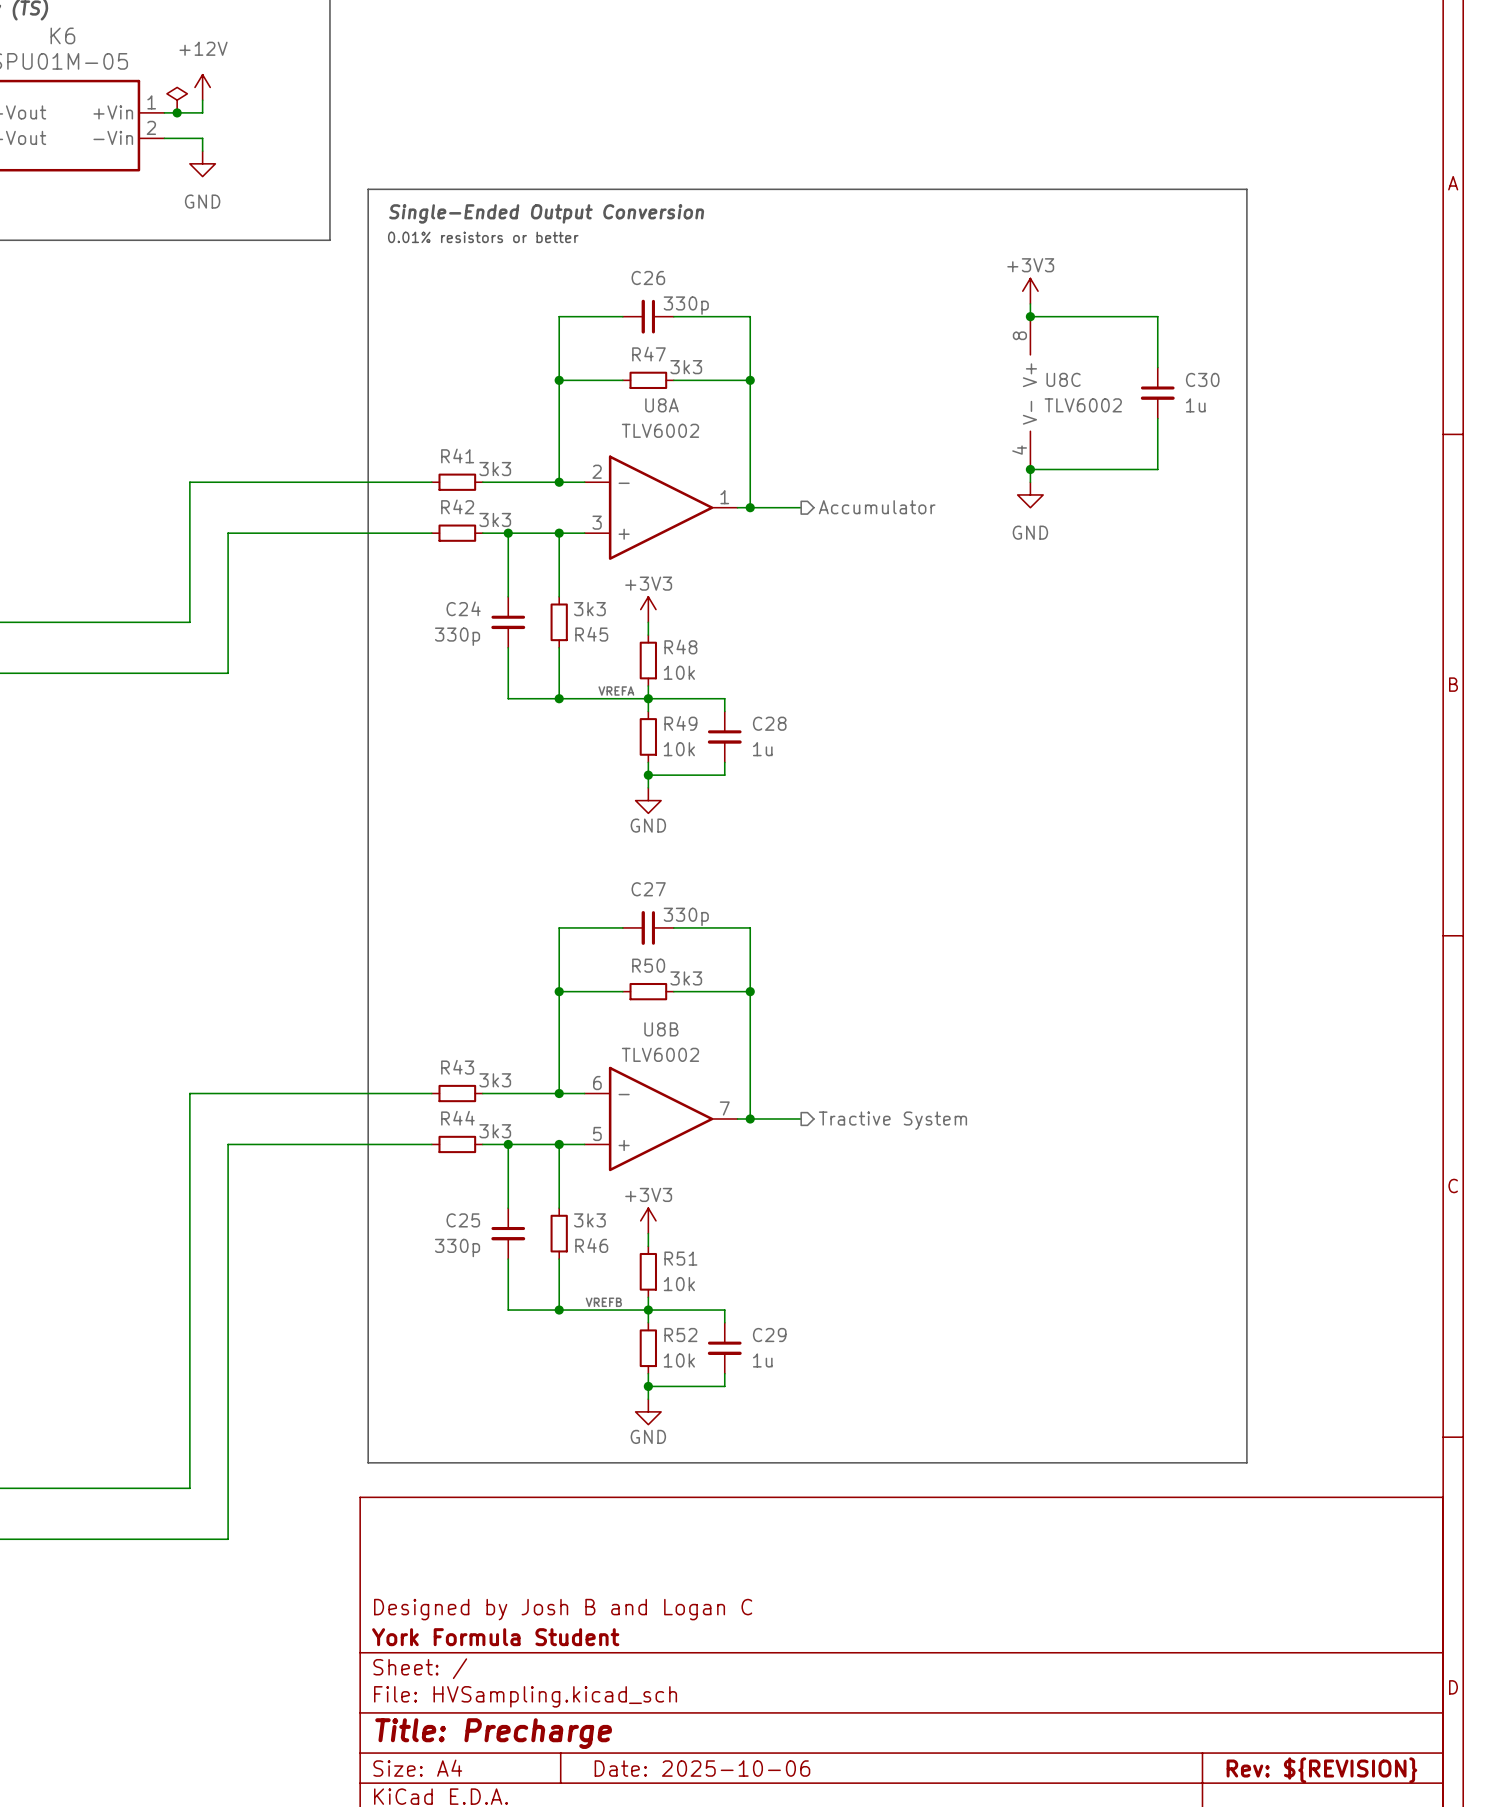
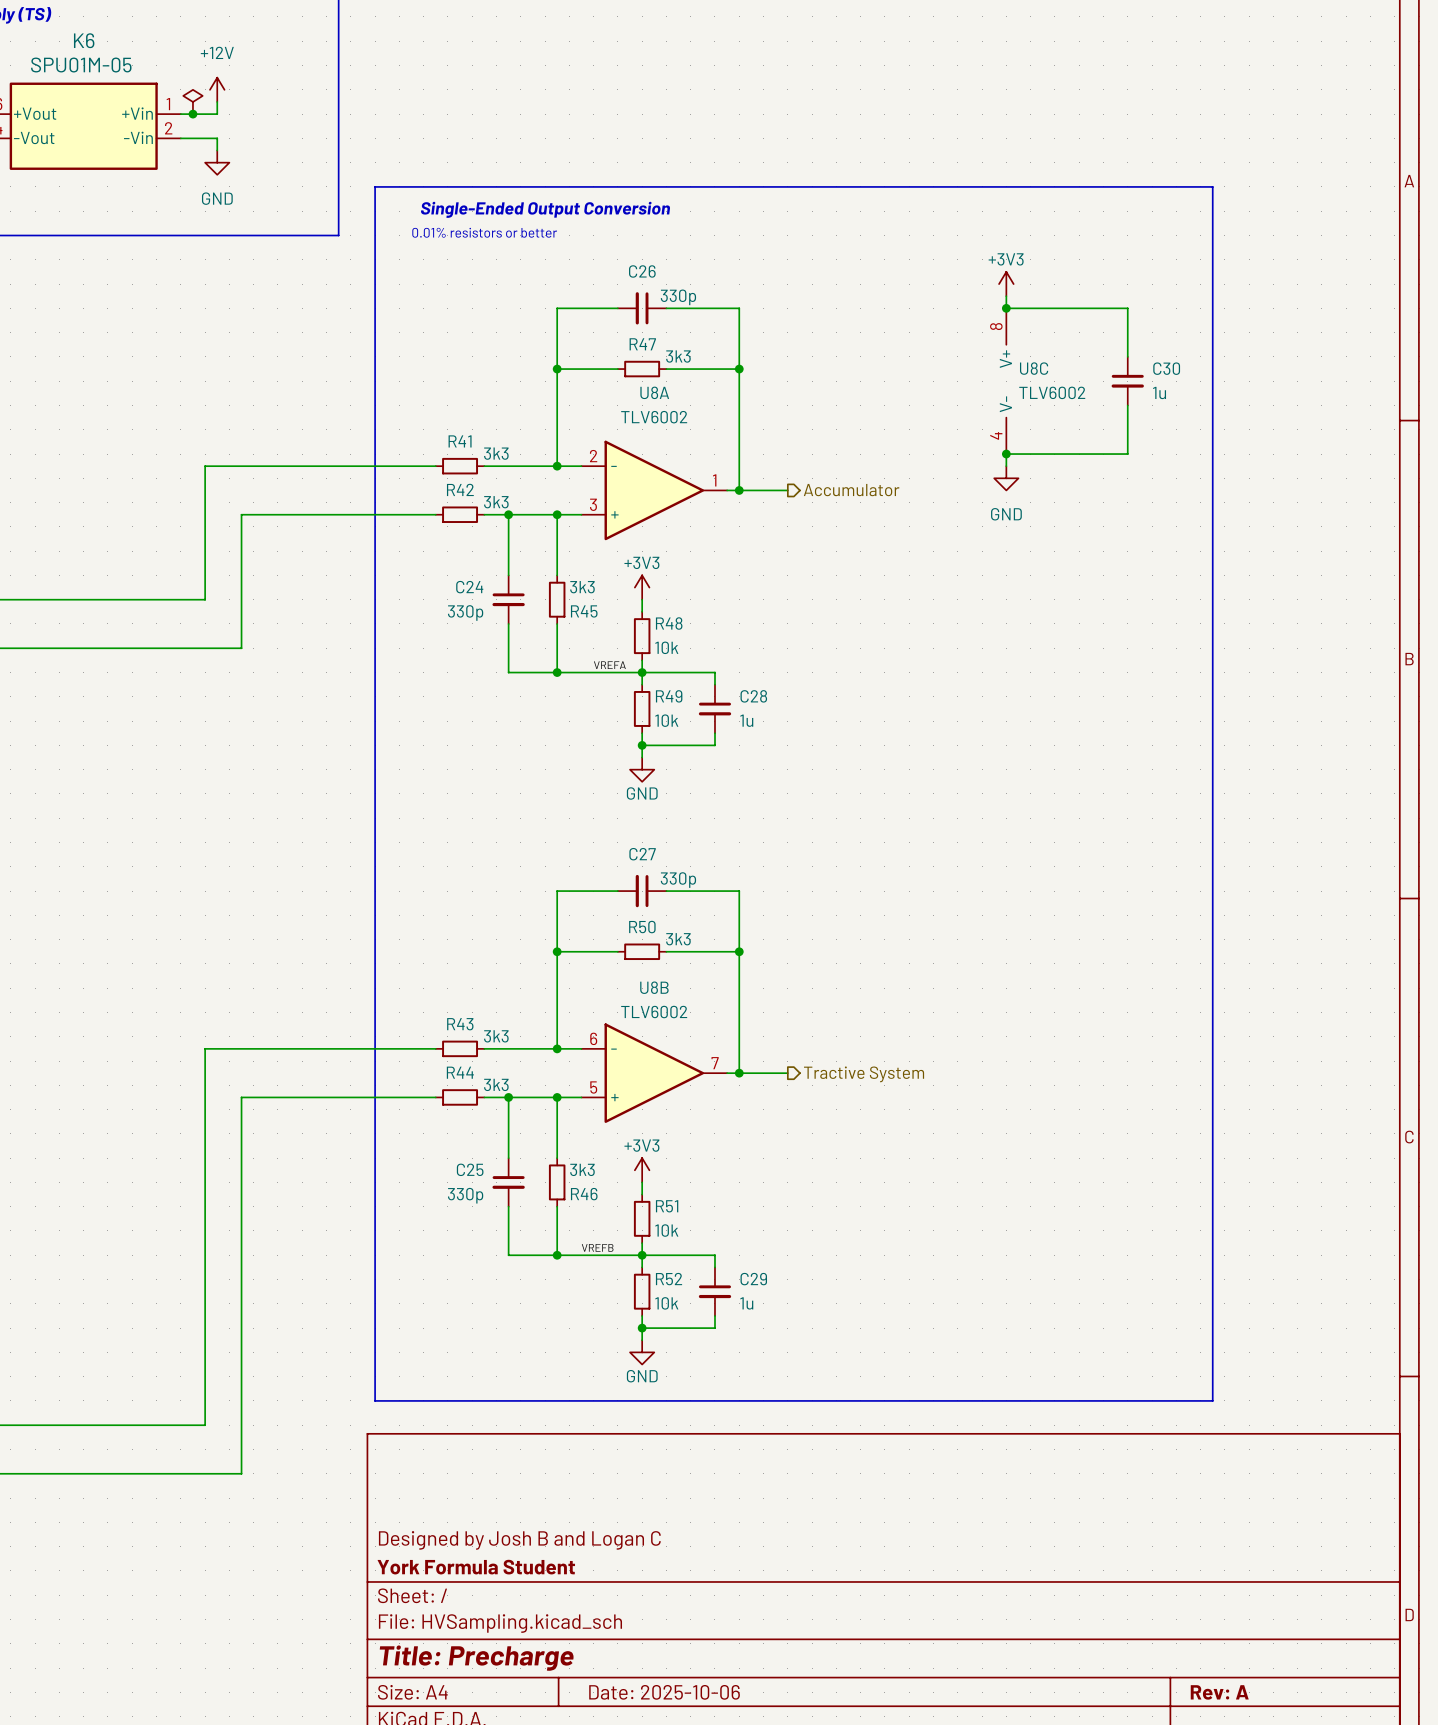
title block: Rev: ${REVISION} (1321, 1770) -> Rev: A (1219, 1692)

